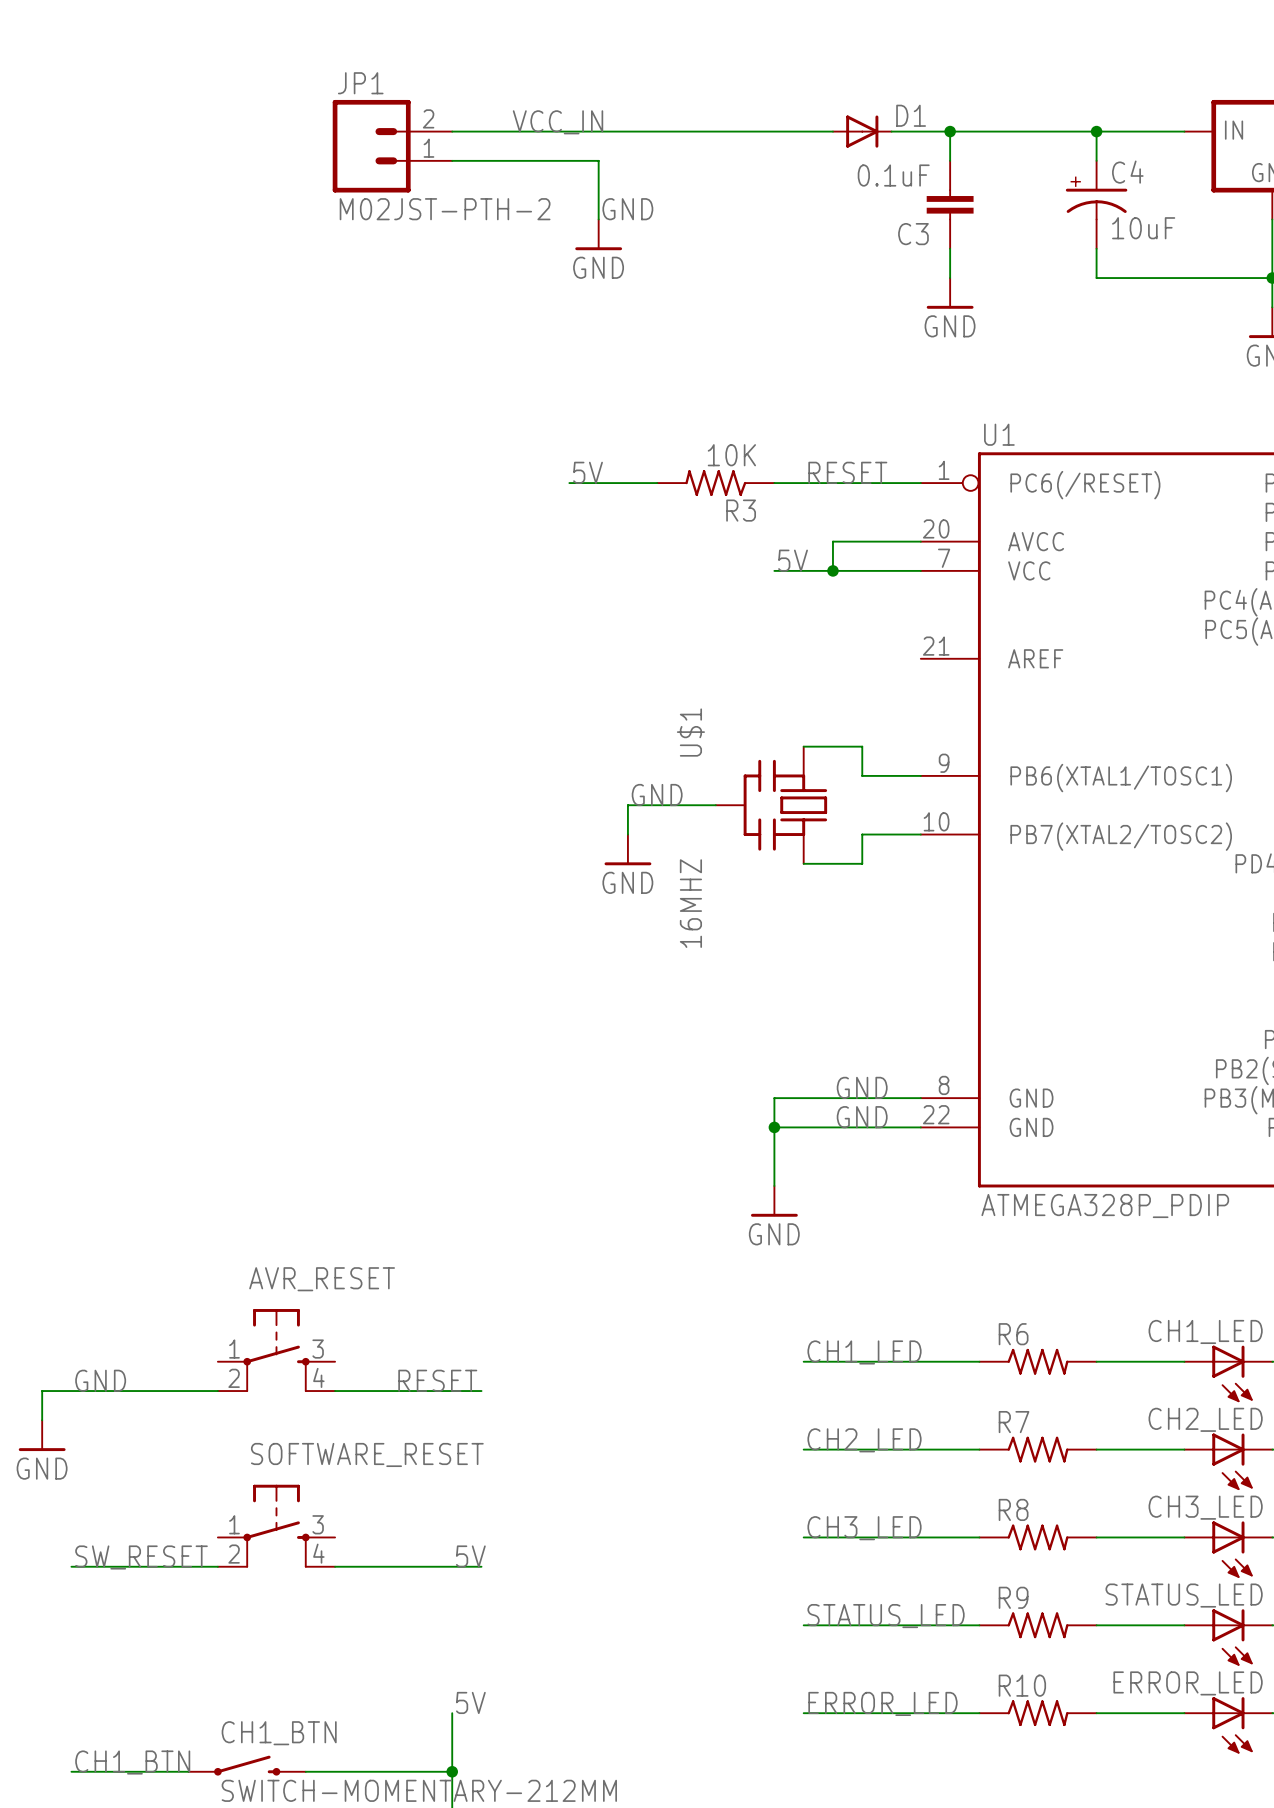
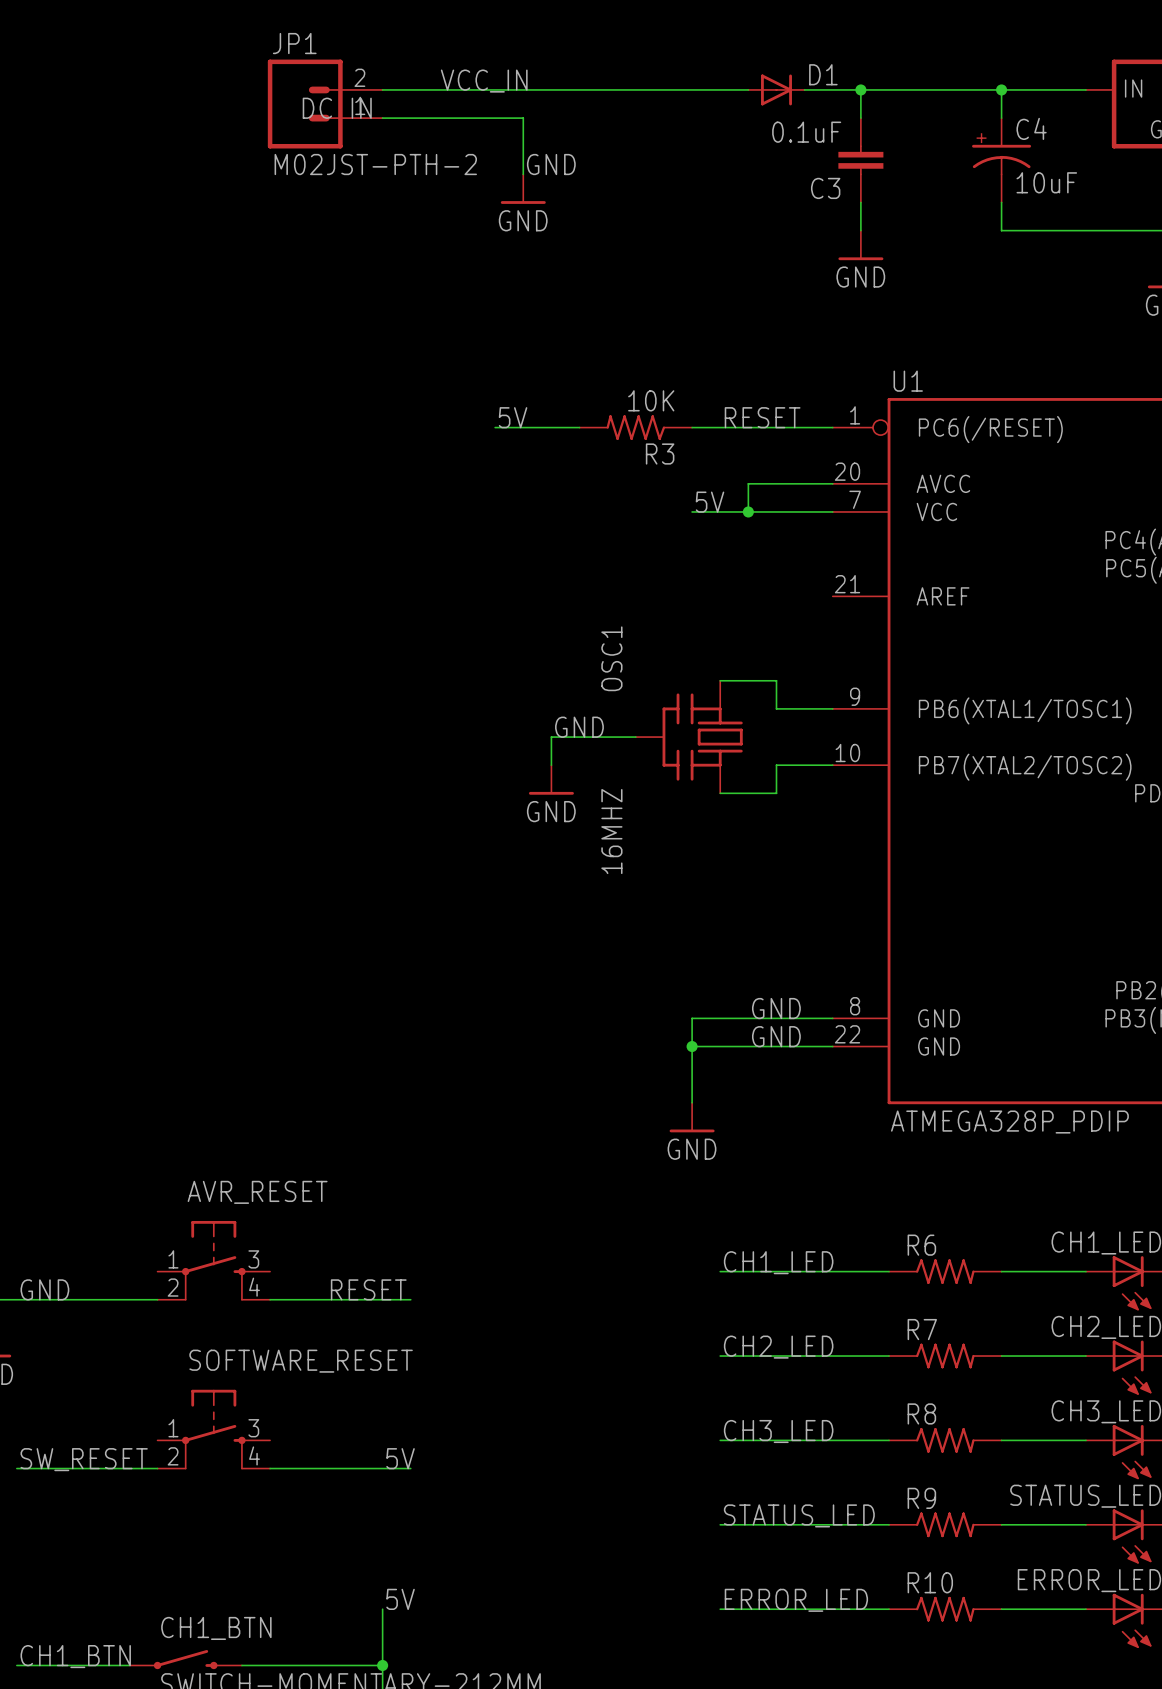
JP1 text: none -> DC IN (337, 108)
U$1 name: U$1 (690, 732) -> OSC1 (611, 658)

